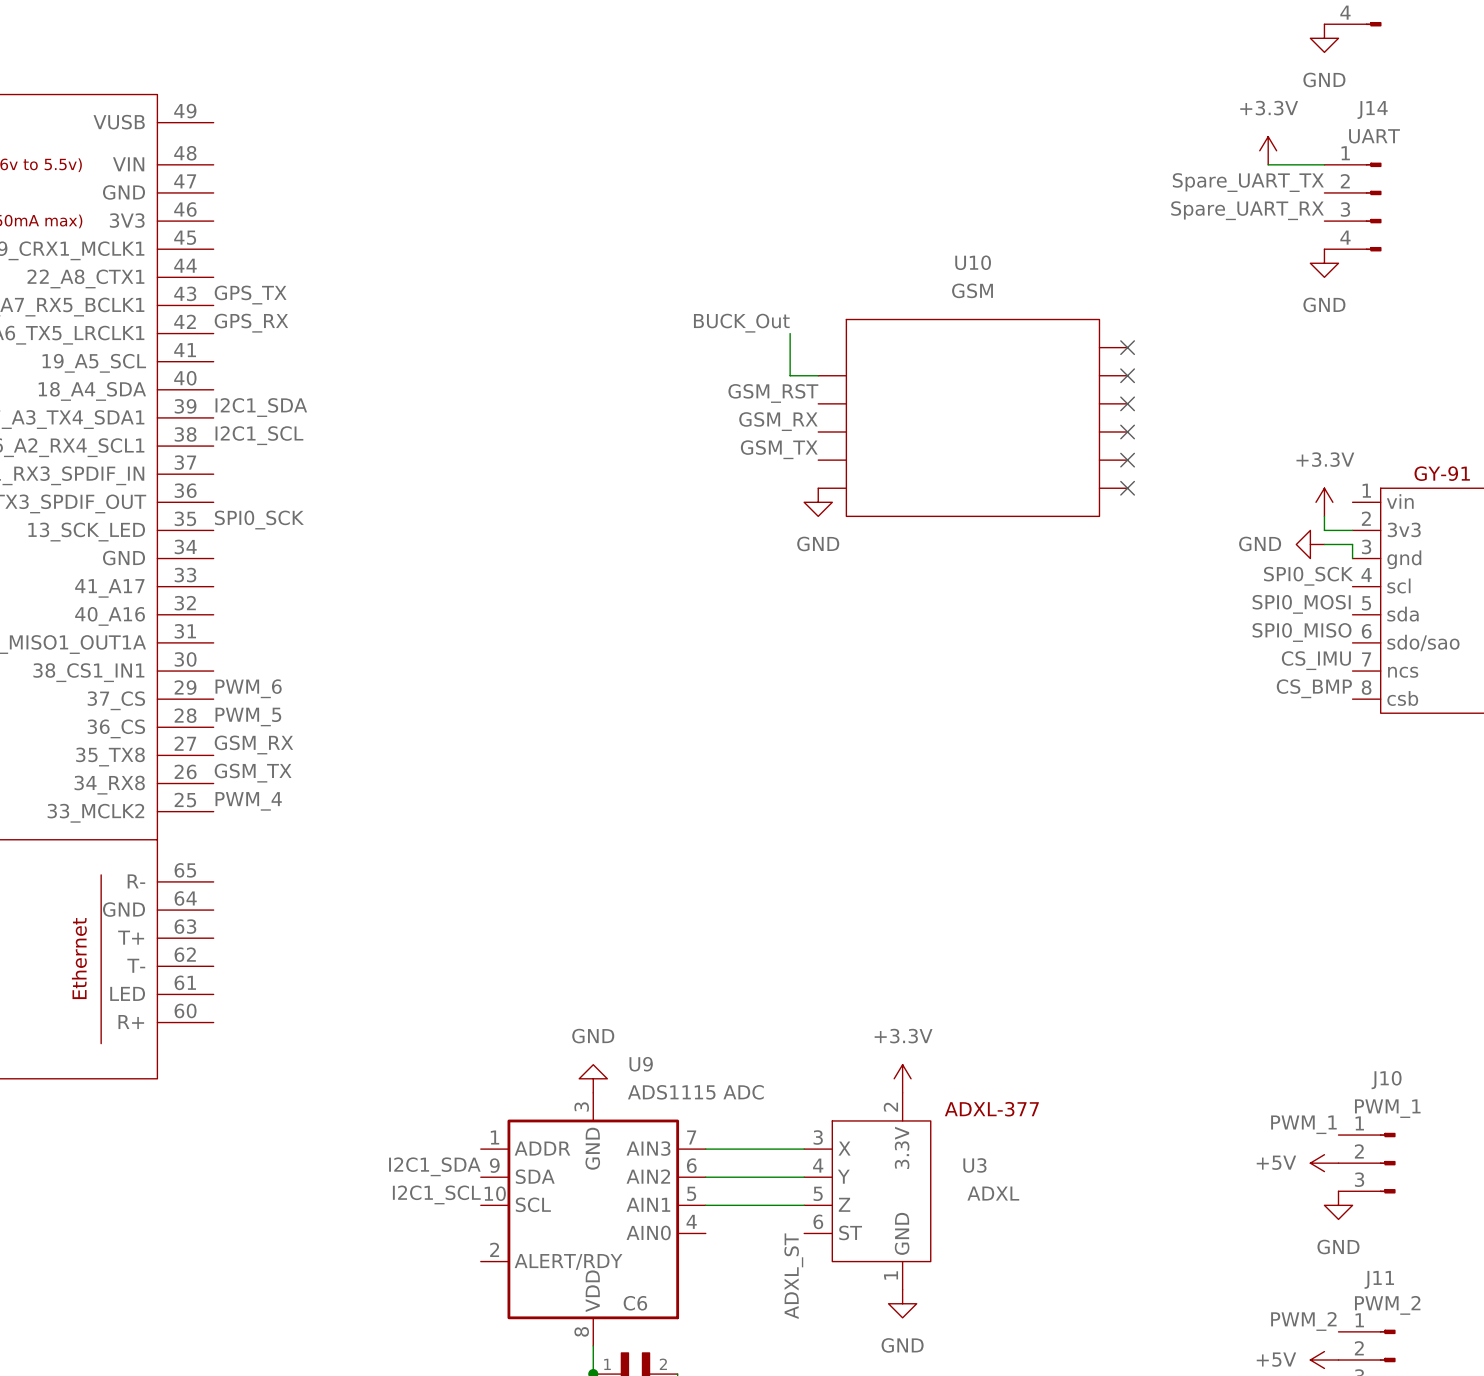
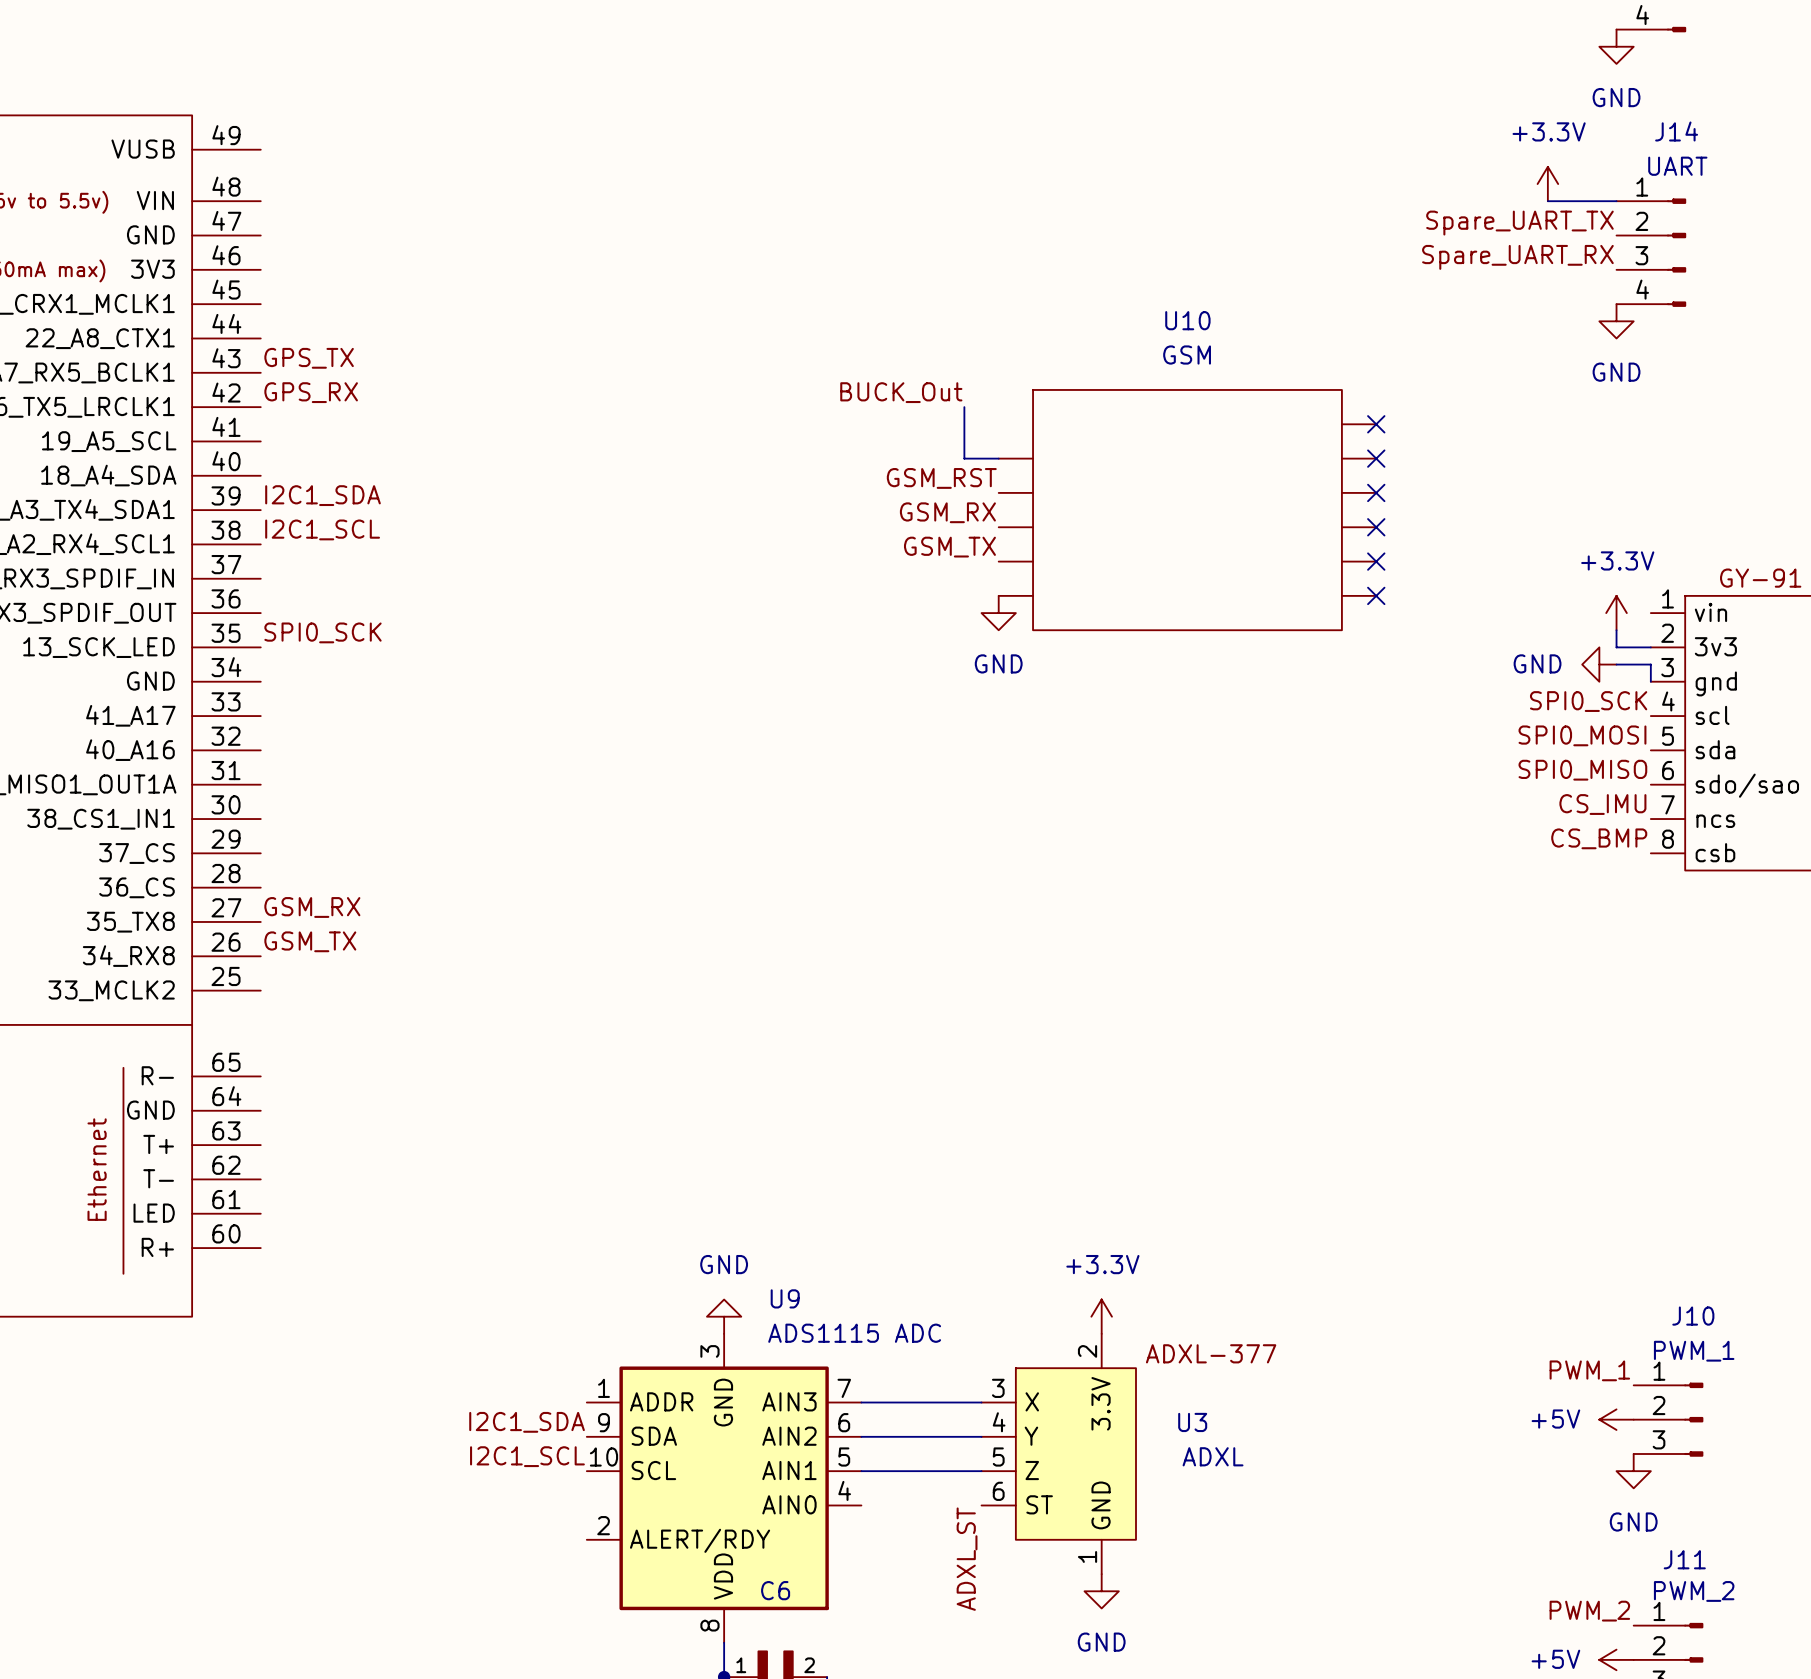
label: PWM_6 (248, 688) -> none
label: PWM_5 (248, 717) -> none
label: PWM_4 (248, 801) -> none

